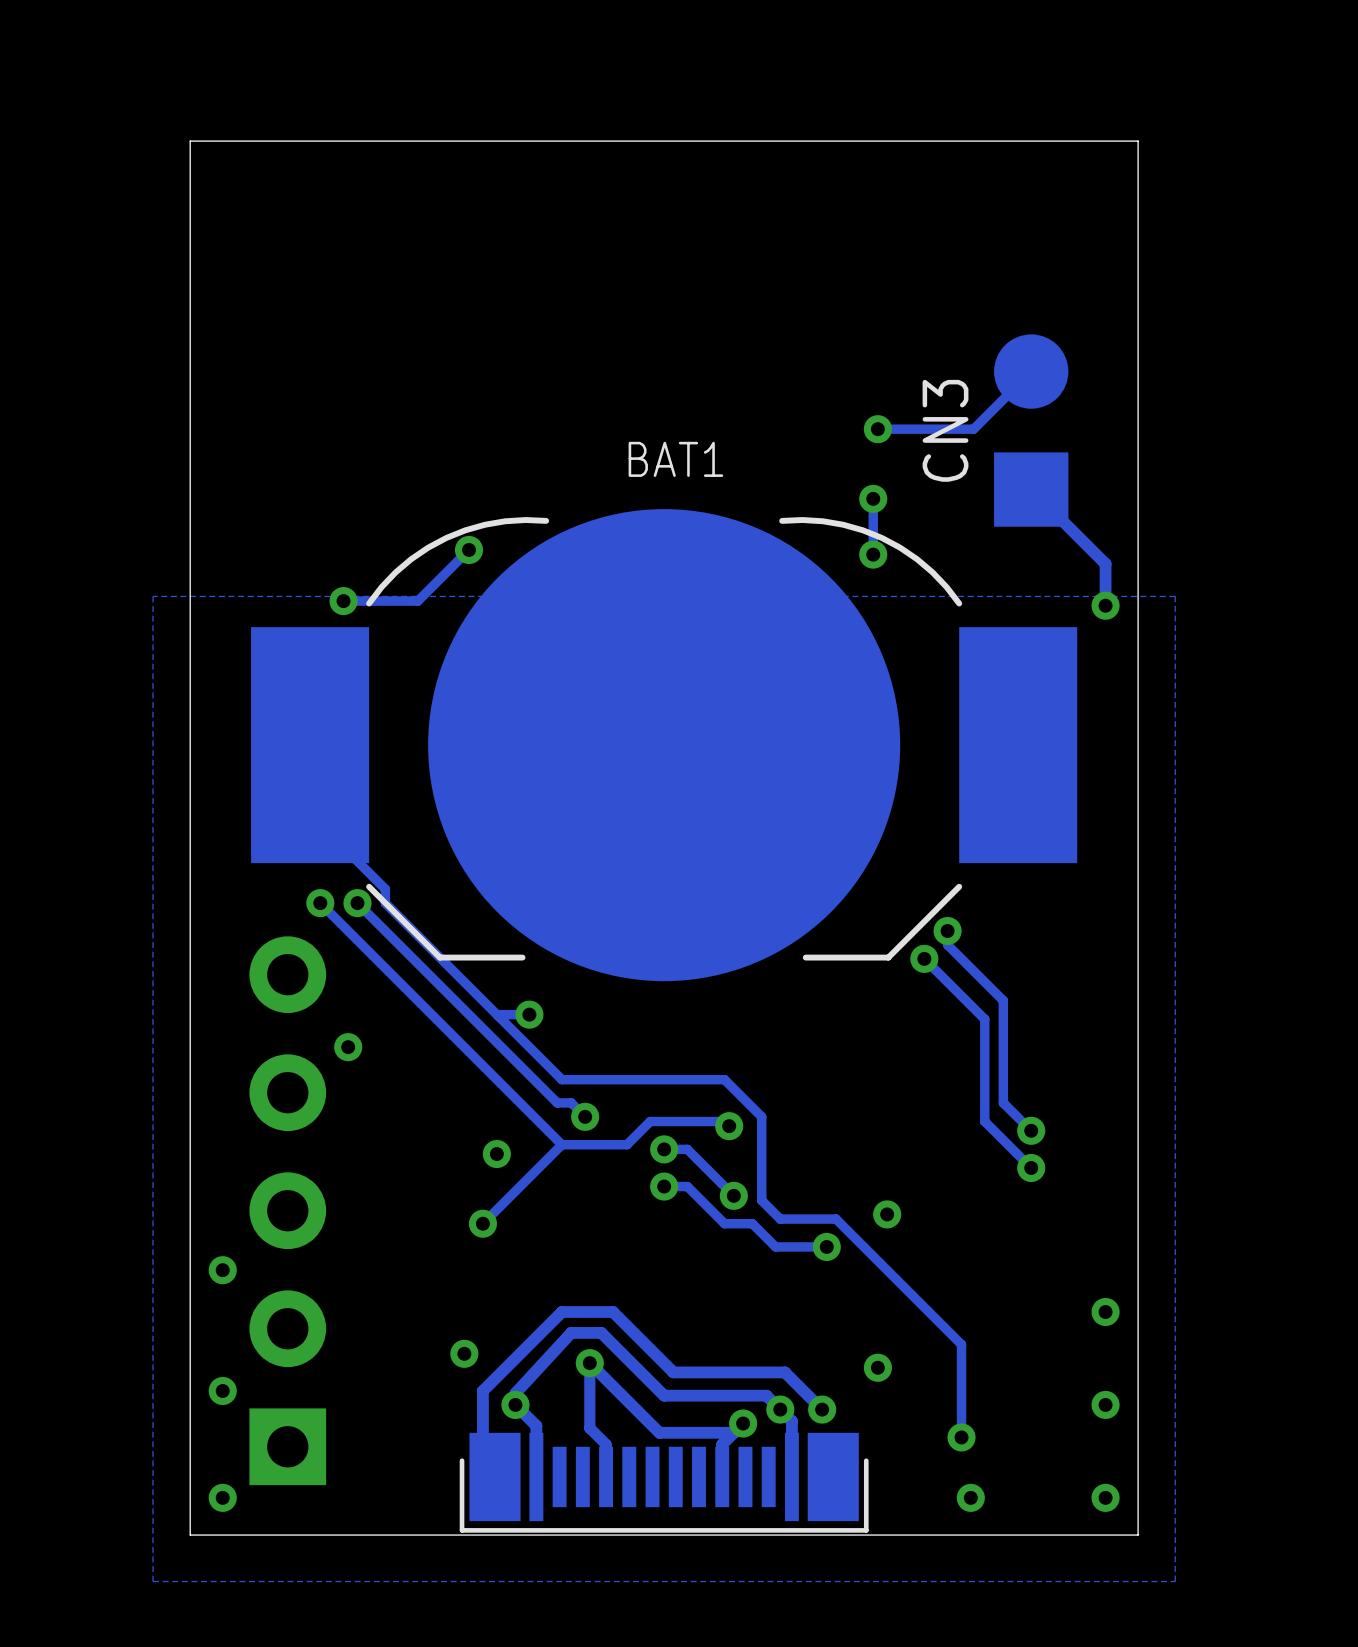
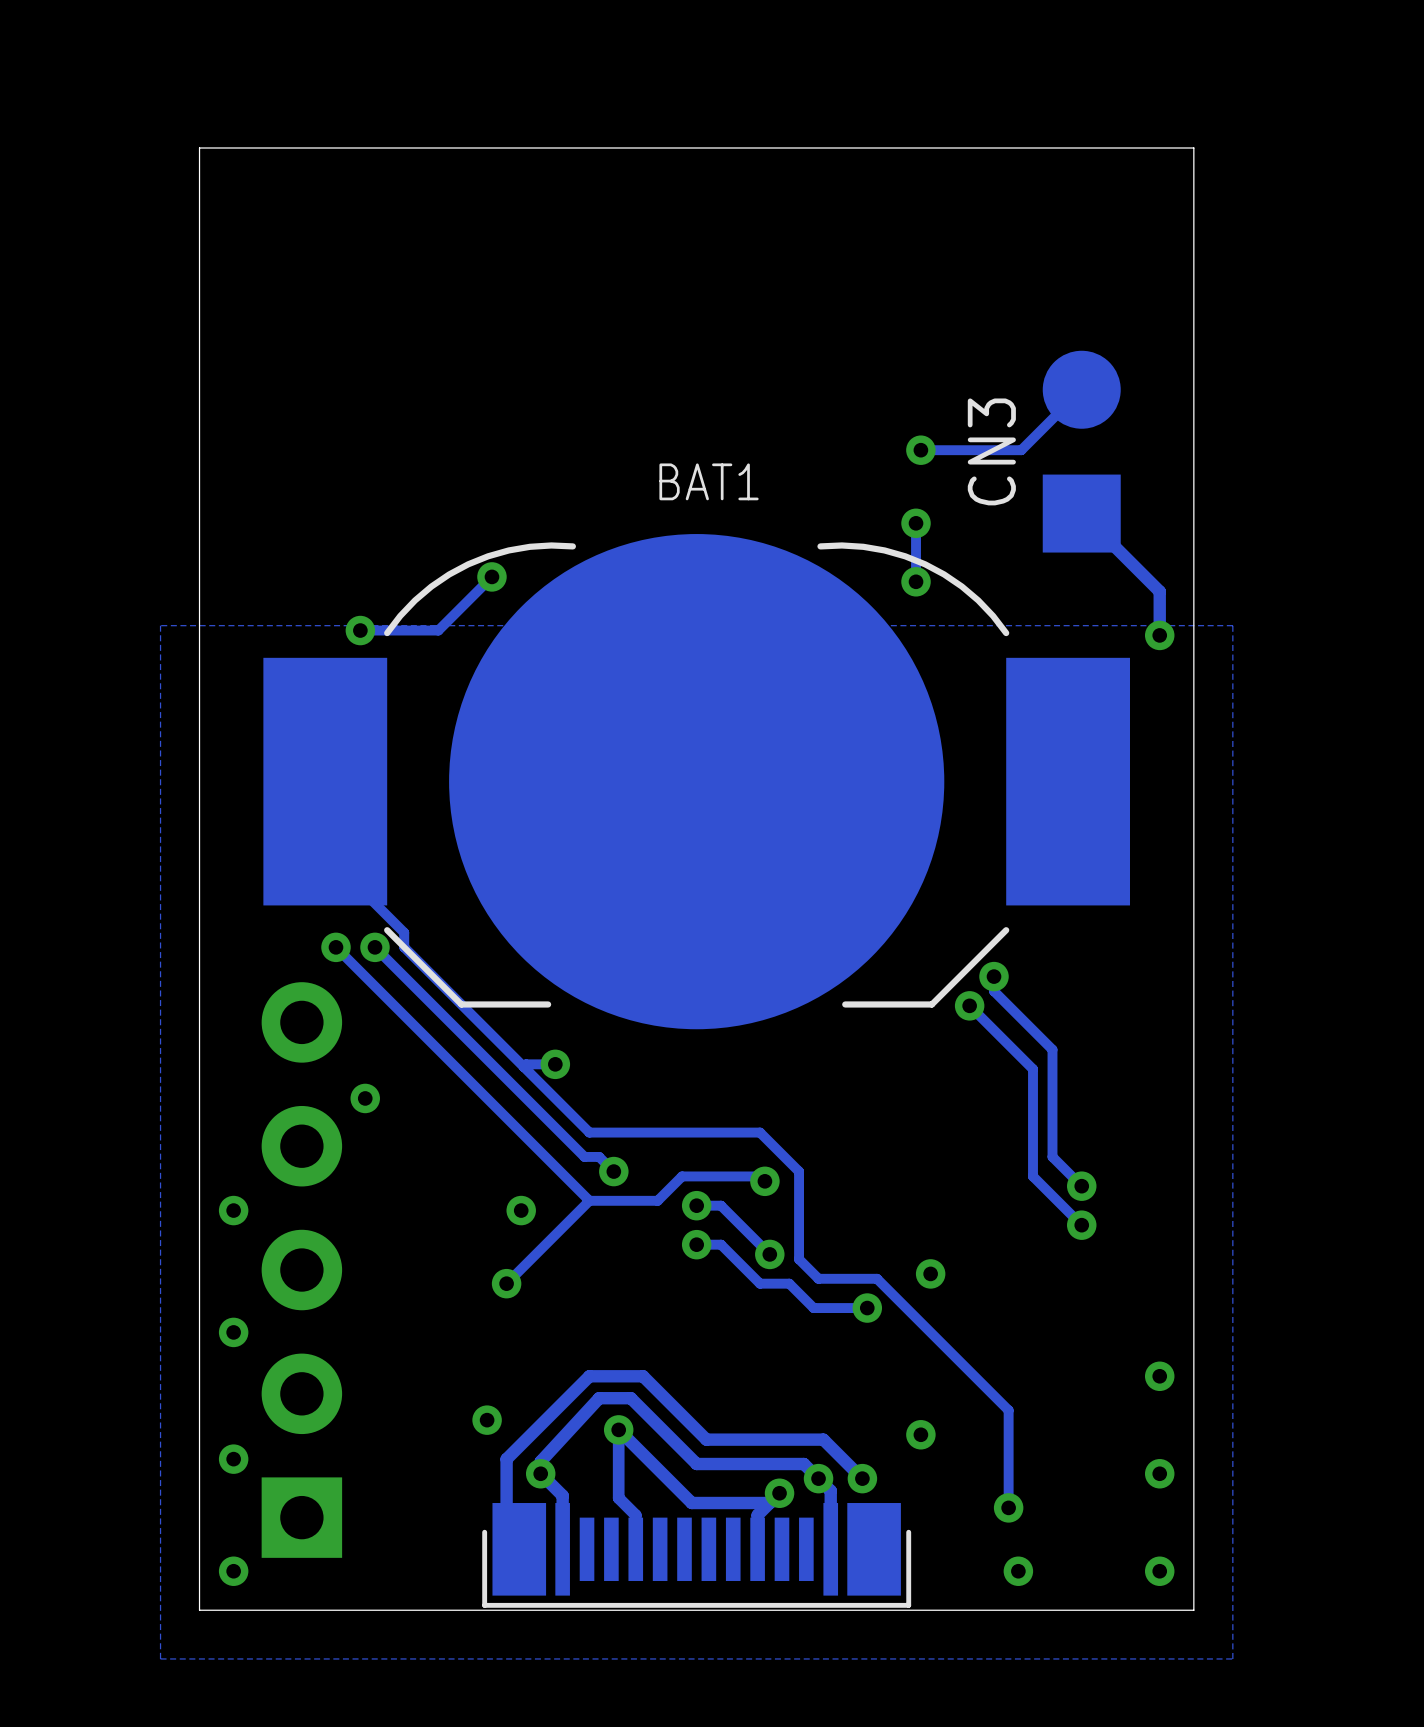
via: none -> (233, 1210)

